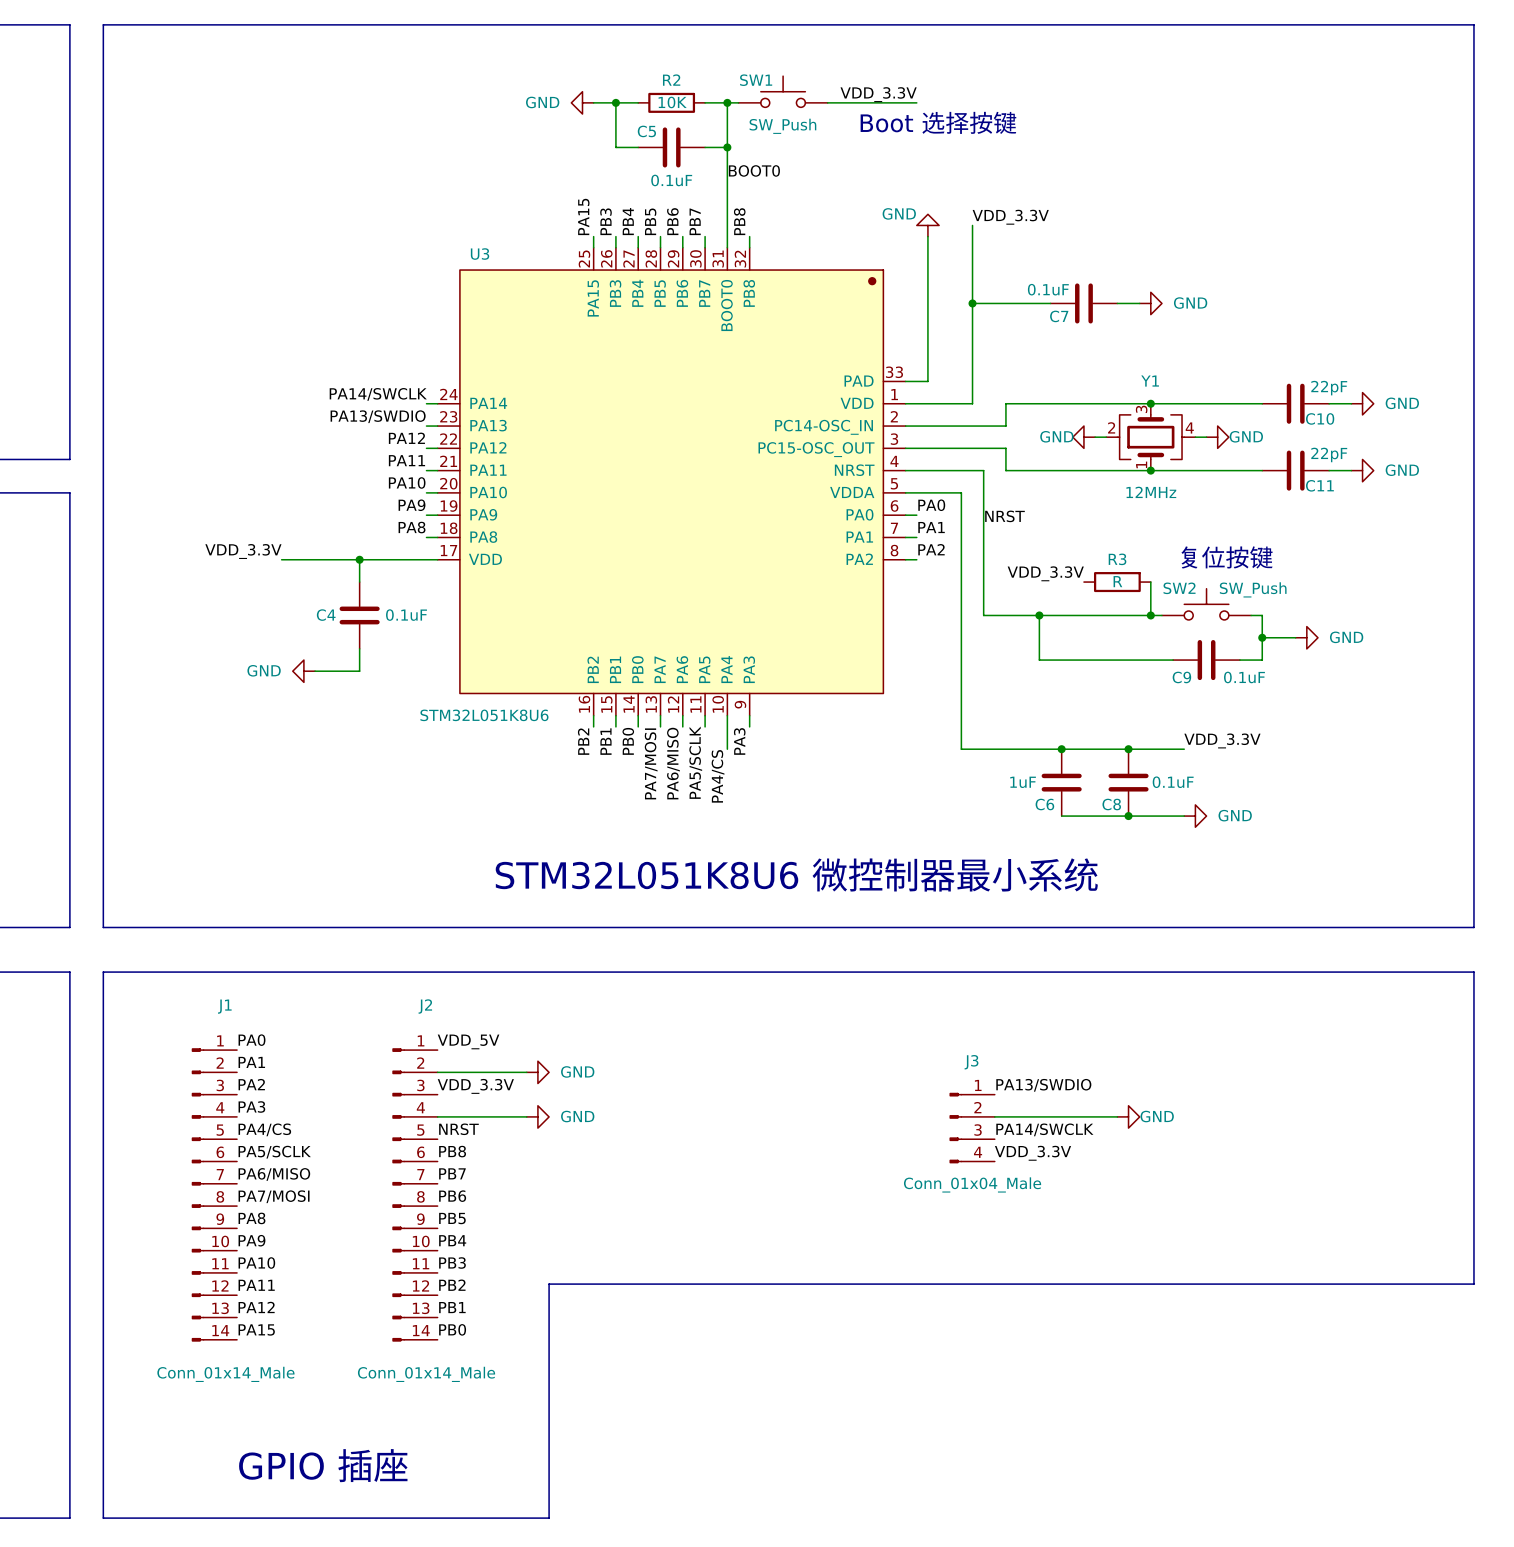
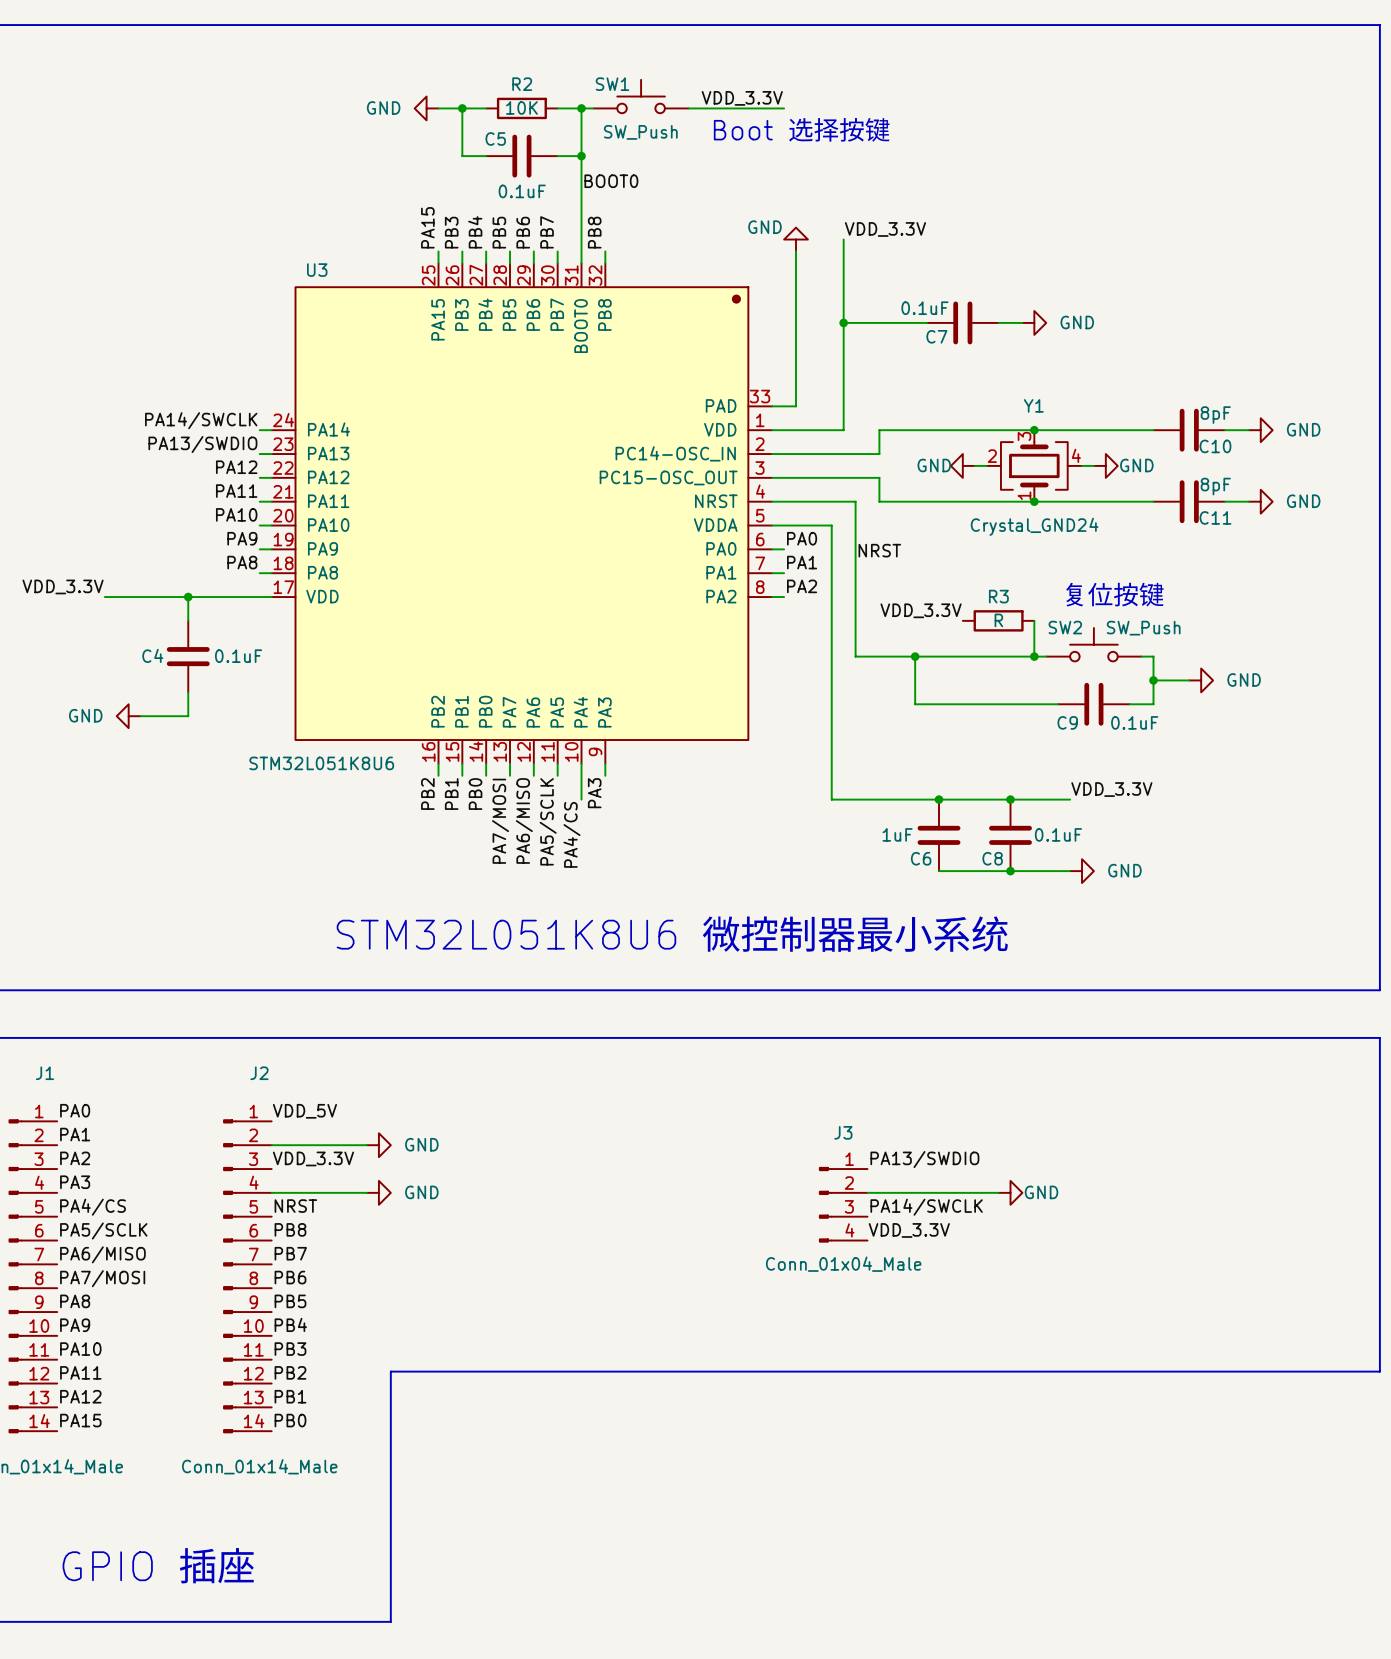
C10 value: 22pF (1329, 388) -> 8pF (1215, 415)
C11 value: 22pF (1329, 454) -> 8pF (1215, 486)
Y1 value: 12MHz (1151, 492) -> Crystal_GND24 (1034, 526)

